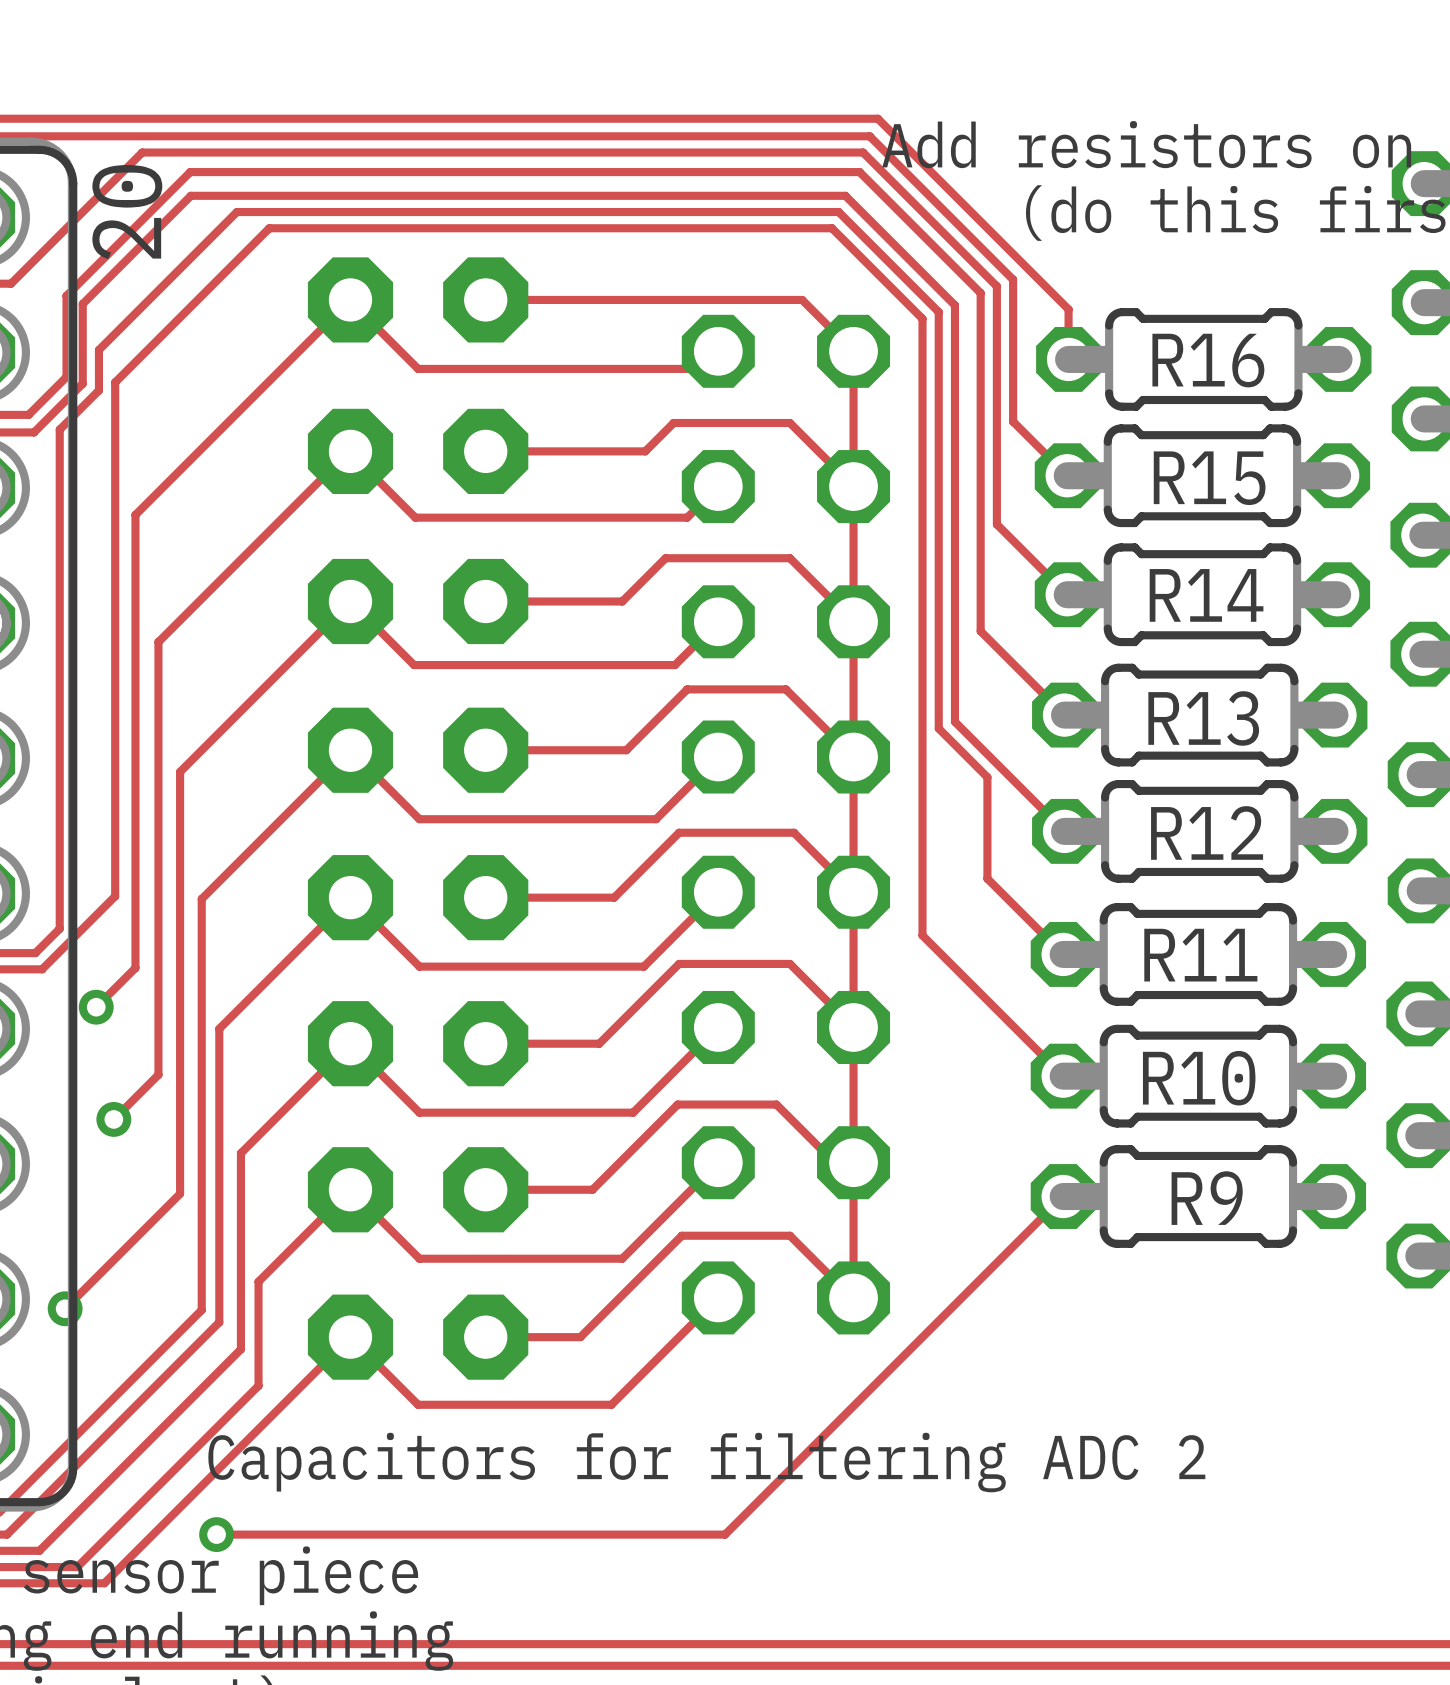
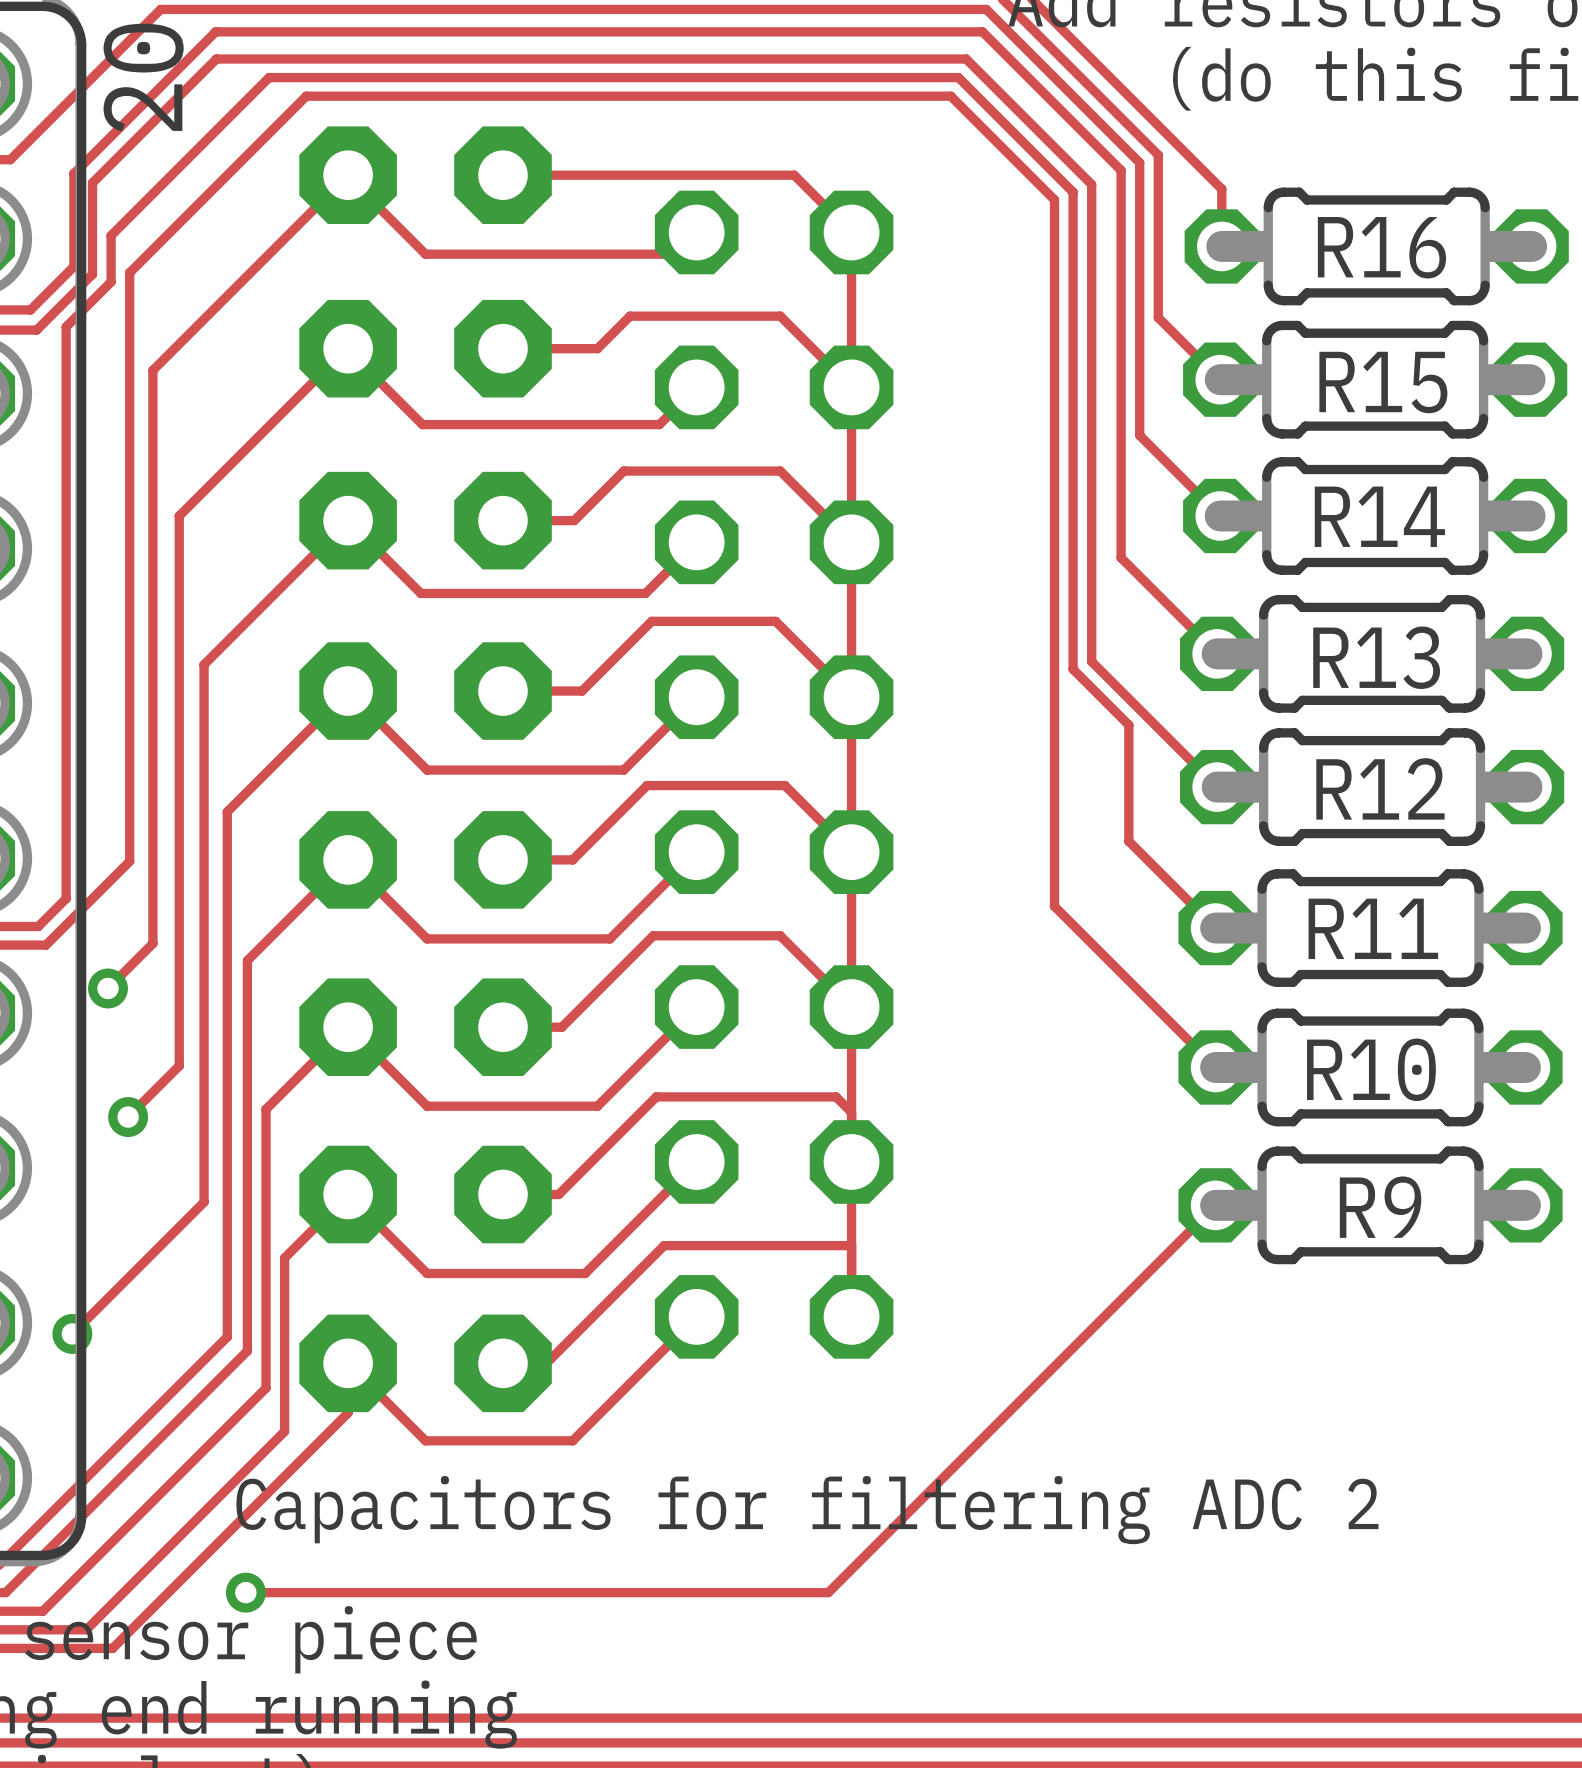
track: none -> (503, 175) (794, 175) (851, 232) (851, 1316)
part position: (418, 299) -> (425, 175)
track: (485, 299) (802, 299) (853, 351) (853, 1297) (789, 1235) (681, 1235) (580, 1337) (485, 1337) -> none
track: (718, 351) (700, 368) (418, 368) (350, 299) (135, 514) -> (696, 232) (674, 254) (425, 254) (348, 175) (152, 370) (152, 424)
track: none -> (346, 348) (422, 424) (659, 424) (696, 387)
track: none -> (503, 348) (597, 348) (630, 316) (780, 316) (851, 387)
track: (349, 451) (158, 642) -> (346, 348) (179, 515) (179, 570)
track: (349, 451) (415, 517) (687, 517) (718, 486) -> none
part position: (418, 451) -> (425, 348)
track: (485, 451) (645, 451) (673, 422) (789, 422) (853, 486) -> none
track: none -> (503, 520) (574, 520) (623, 471) (780, 471) (851, 542)
part position: (418, 601) -> (425, 520)
track: (485, 601) (622, 601) (665, 558) (789, 558) (853, 621) -> none
track: (718, 621) (675, 665) (414, 665) (350, 601) (180, 771) -> (696, 542) (645, 593) (420, 593) (348, 520) (204, 664) (204, 718)
track: none -> (503, 691) (582, 691) (651, 621) (775, 621) (851, 697)
part position: (418, 750) -> (425, 691)
track: (485, 750) (626, 750) (687, 689) (785, 689) (853, 757) -> none
track: (718, 757) (656, 819) (419, 819) (350, 750) (201, 899) (200, 1311) -> (696, 697) (623, 770) (427, 770) (348, 691) (227, 811) (227, 1337)
part position: (785, 824) -> (774, 774)
track: none -> (851, 852) (784, 785) (647, 785) (572, 859) (503, 859)
track: (718, 892) (643, 966) (419, 966) (350, 897) (219, 1028) (217, 1323) -> (696, 852) (609, 938) (427, 938) (348, 859) (247, 960) (247, 1350)
track: (853, 892) (794, 832) (679, 832) (614, 897) (485, 897) -> none
part position: (418, 897) -> (425, 859)
track: none -> (851, 1007) (780, 935) (653, 935) (561, 1027) (503, 1027)
track: (718, 1027) (633, 1112) (419, 1112) (350, 1043) (240, 1153) (240, 1349) (234, 1356) -> (696, 1007) (597, 1106) (427, 1106) (348, 1027) (266, 1109) (266, 1388)
track: (853, 1027) (789, 963) (679, 963) (599, 1043) (485, 1043) -> none
part position: (418, 1043) -> (425, 1027)
track: none -> (851, 1112) (836, 1096) (656, 1096) (558, 1194) (503, 1194)
track: (718, 1162) (622, 1258) (419, 1258) (350, 1189) (258, 1281) (258, 1385) (250, 1393) -> (696, 1161) (585, 1273) (427, 1273) (348, 1194) (284, 1258) (284, 1431)
track: (853, 1162) (834, 1162) (776, 1104) (677, 1104) (592, 1189) (485, 1189) -> none
part position: (418, 1189) -> (425, 1194)
track: none -> (851, 1245) (664, 1245) (546, 1363) (503, 1363)
track: (718, 1297) (611, 1404) (418, 1404) (350, 1337) (104, 1583) (100, 1583) -> (696, 1316) (572, 1440) (425, 1440) (348, 1363) (348, 1412) (112, 1648)
part position: (418, 1337) -> (425, 1363)

